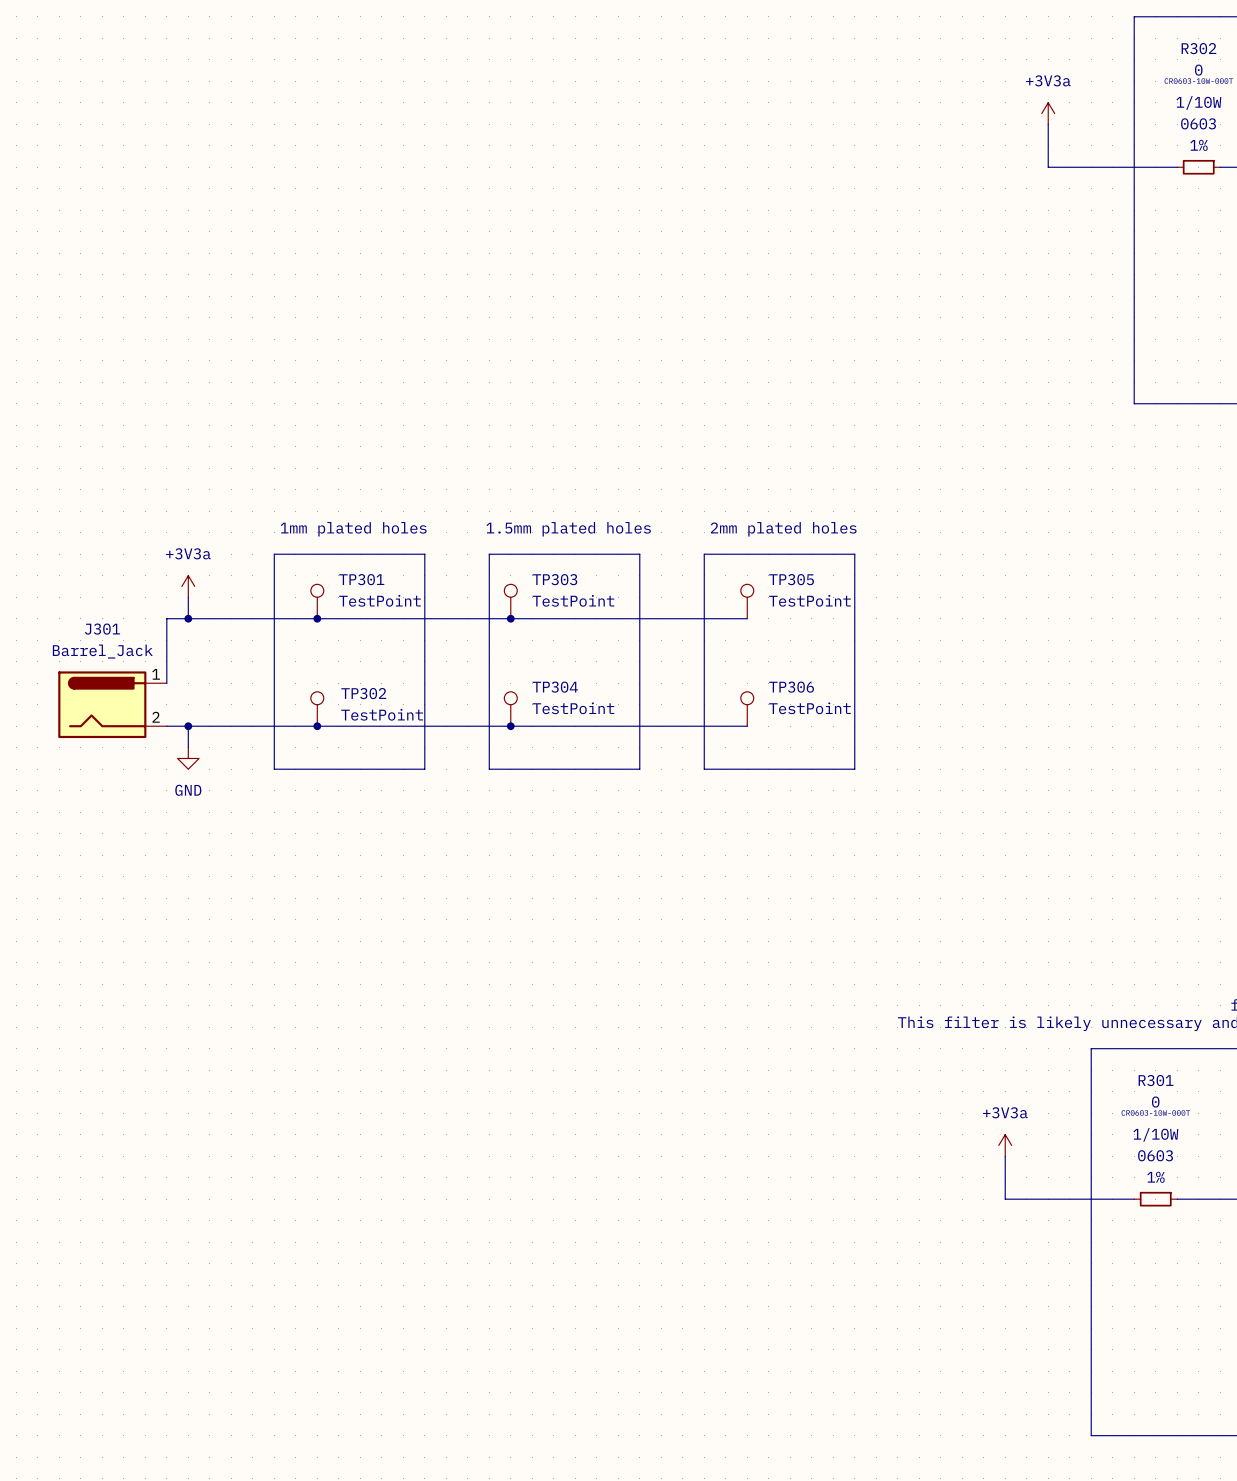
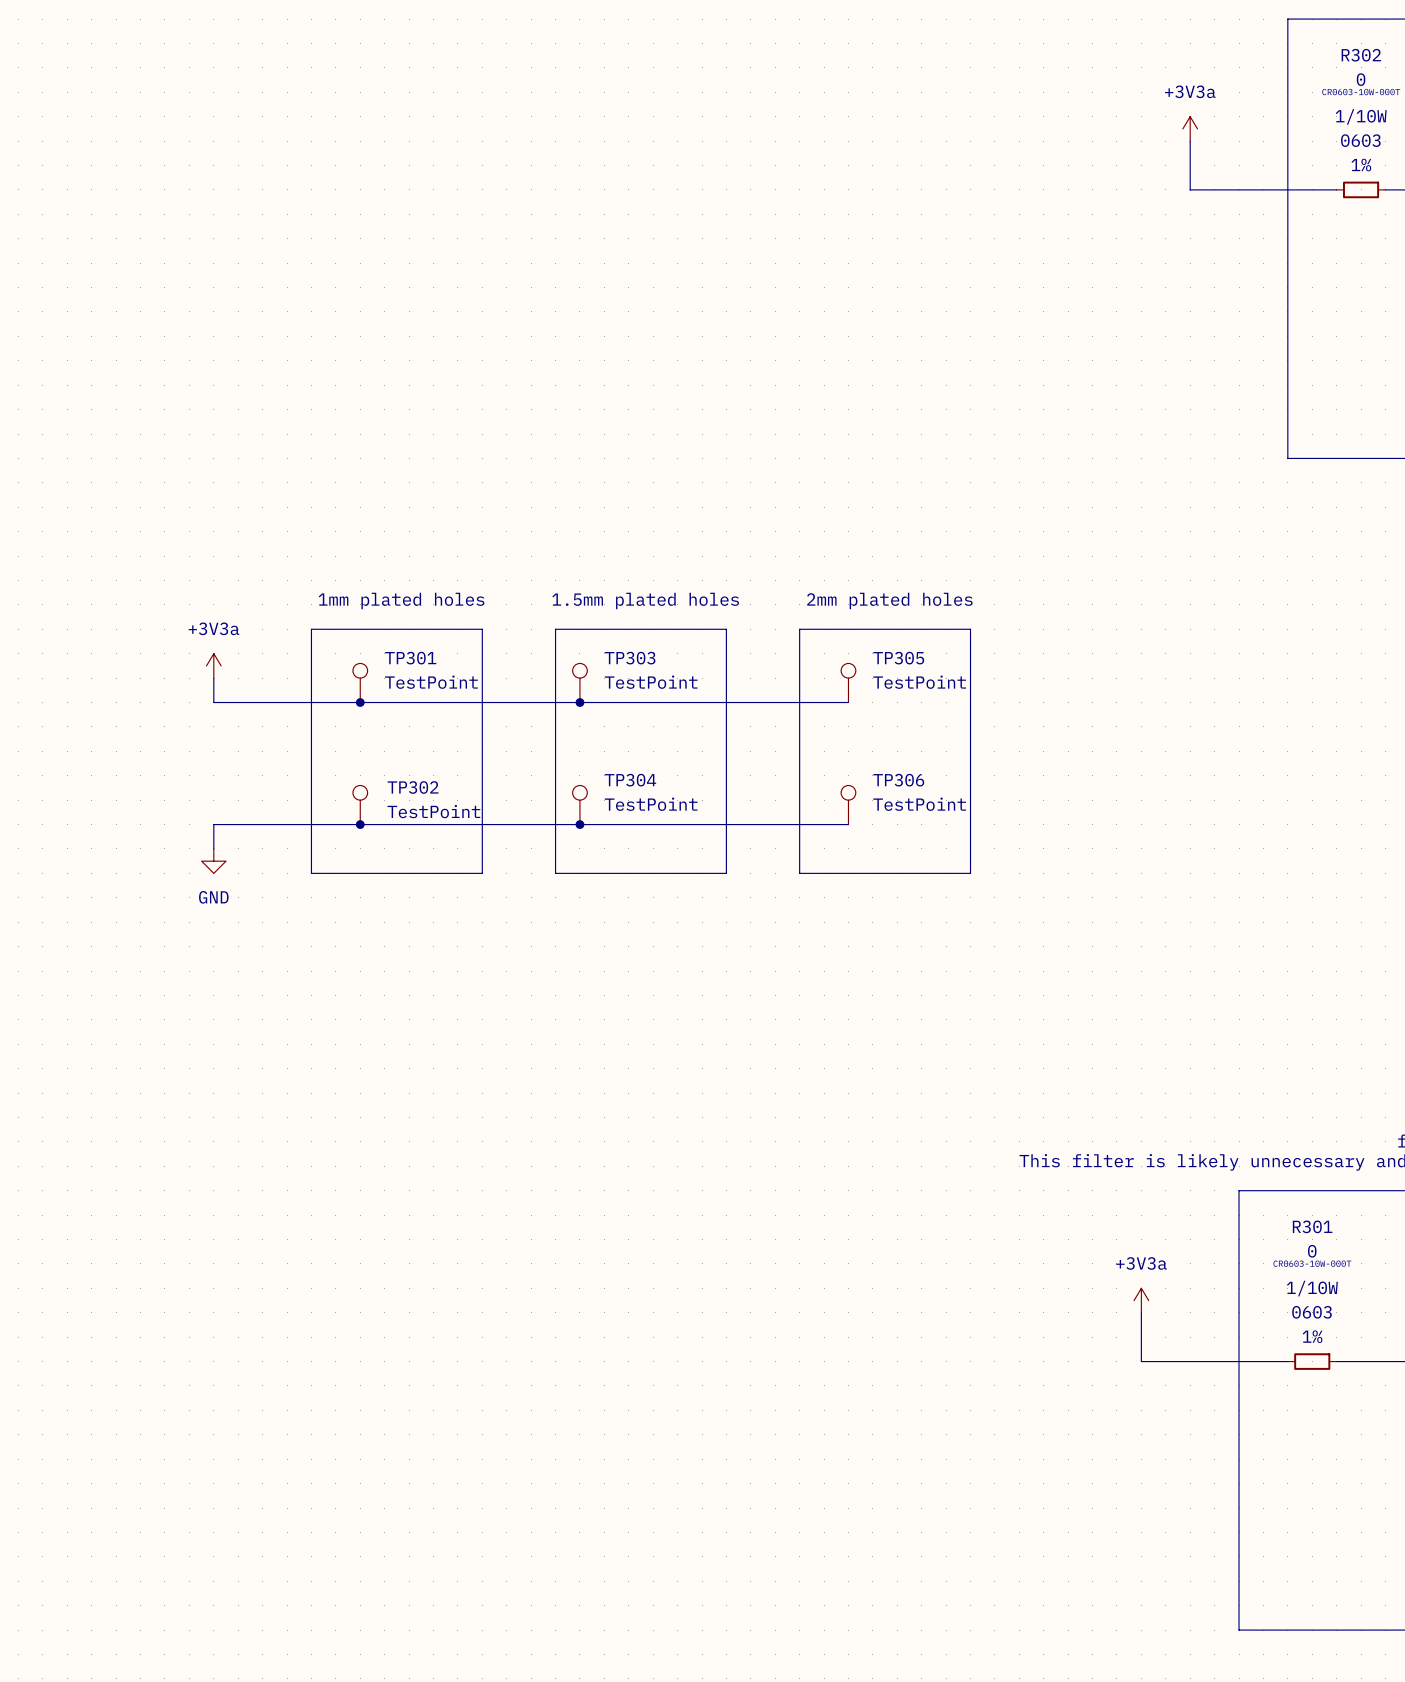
wire: (188, 618) (166, 618) (166, 683) -> none
junction: (188, 618) -> none
J301: Barrel_Jack (112, 704) -> none
wire: (166, 726) (188, 726) -> none
junction: (188, 726) -> none

